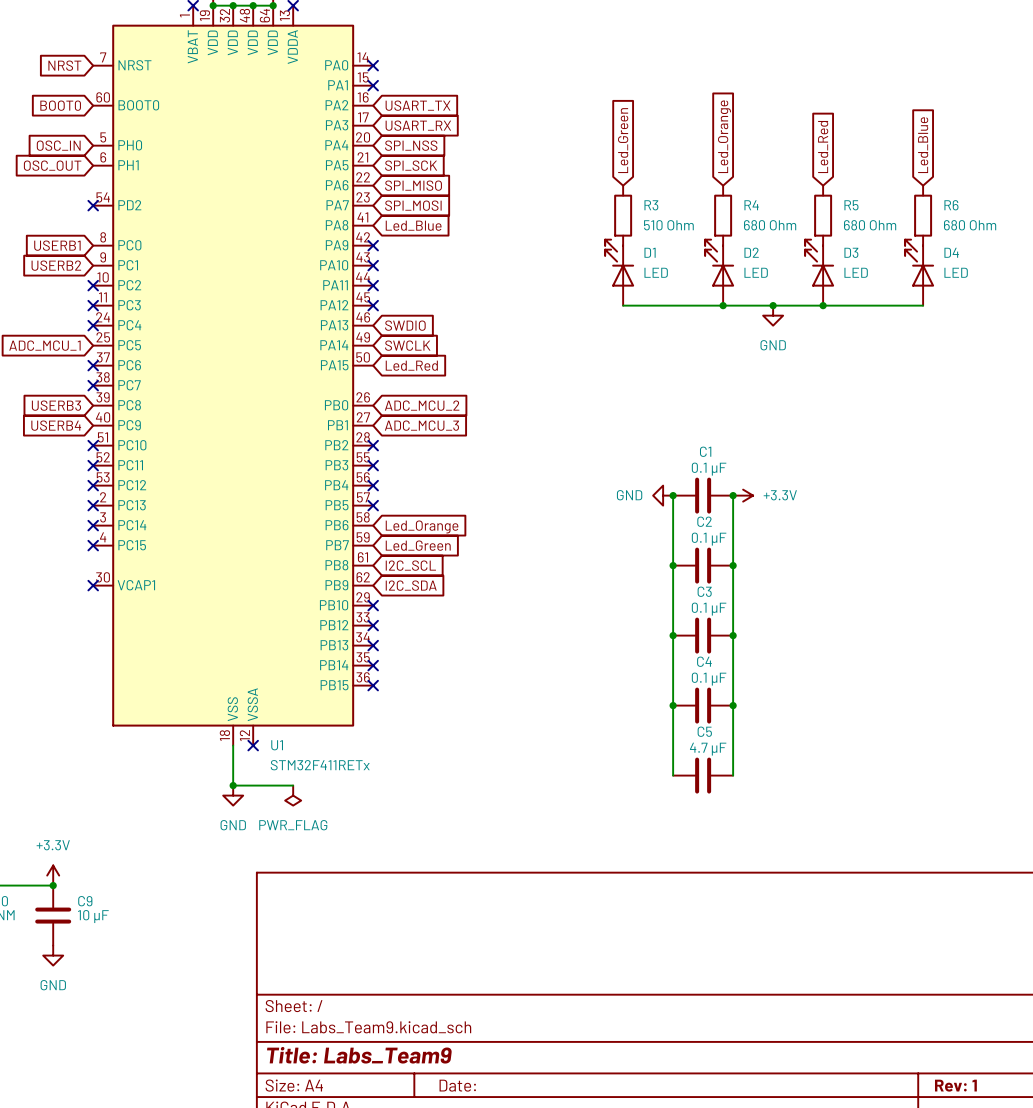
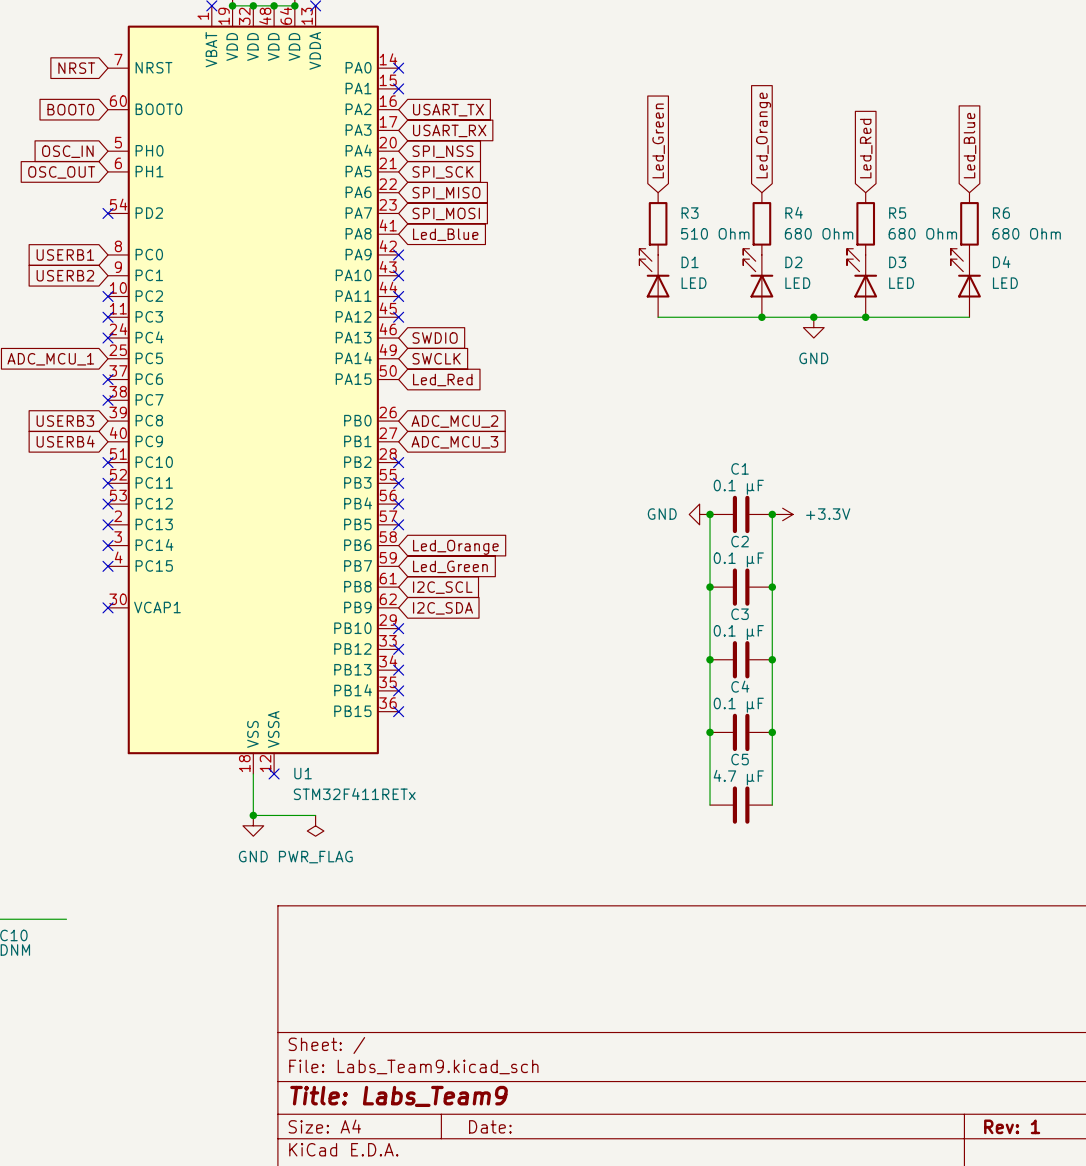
power symbol: +3.3V (53, 875) -> none
junction: (53, 885) -> none
C9: 10 μF (53, 915) -> none
power symbol: GND (53, 955) -> none

